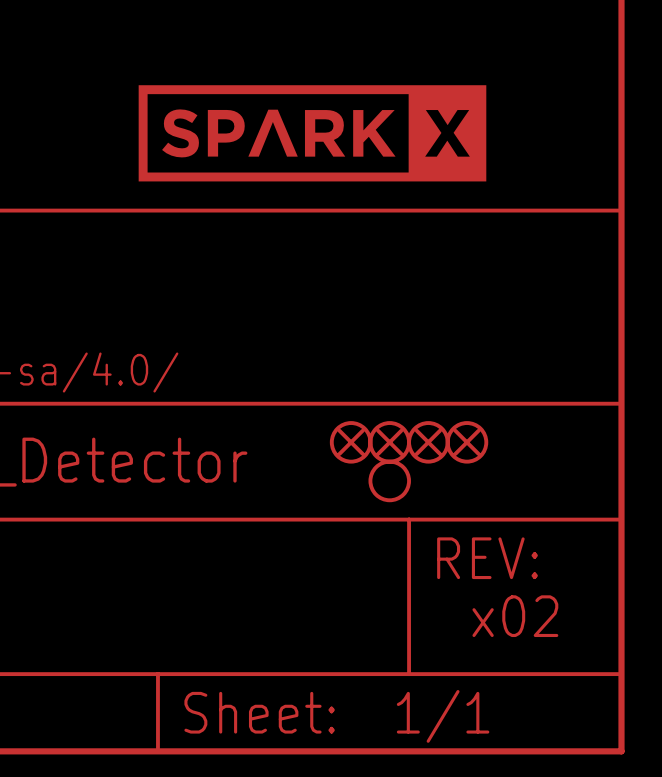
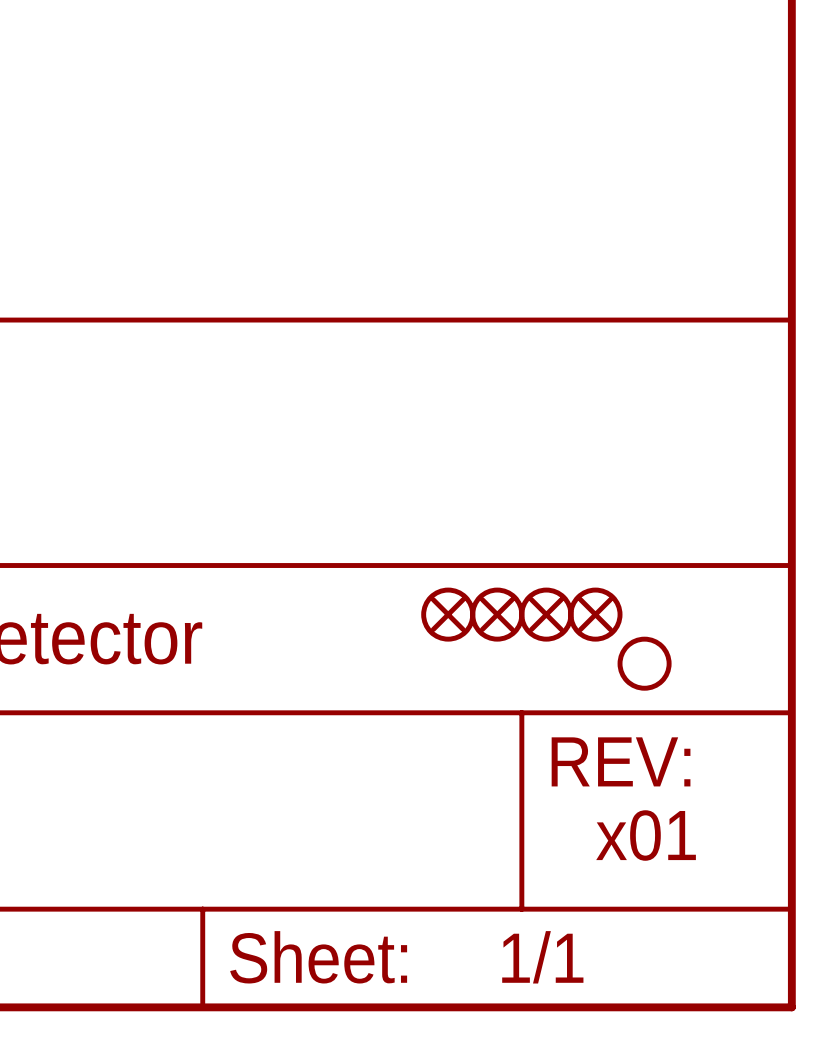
part: (312, 133) -> none
part position: (389, 480) -> (644, 663)
text: x02 (515, 616) -> x01 (646, 835)

